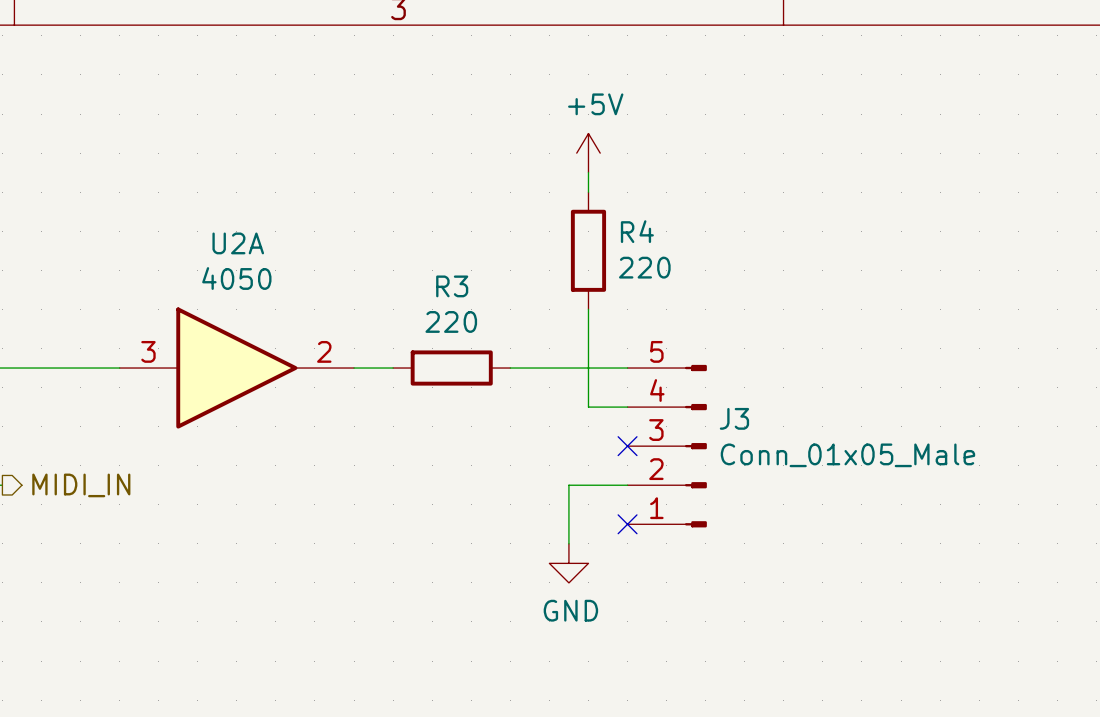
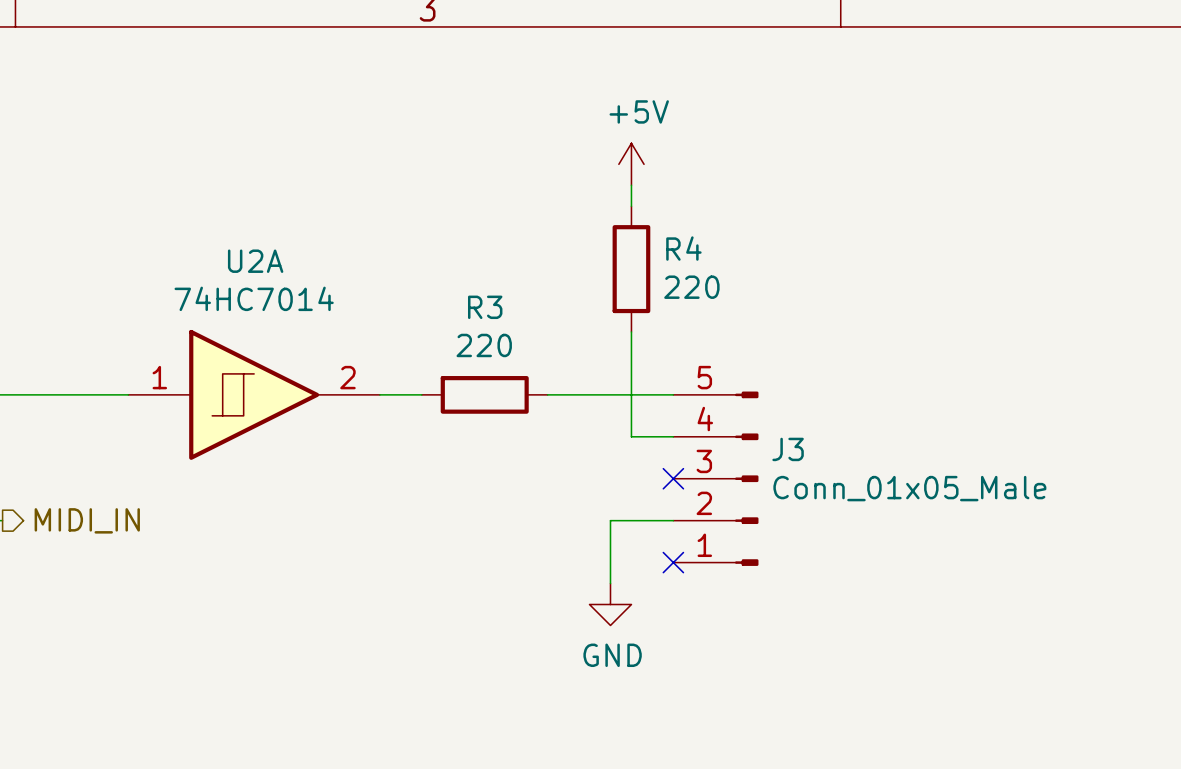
U2A value: 4050 (236, 278) -> 74HC7014 (254, 298)
U2A symbol: [119, 307, 355, 429] -> [128, 329, 380, 460]

